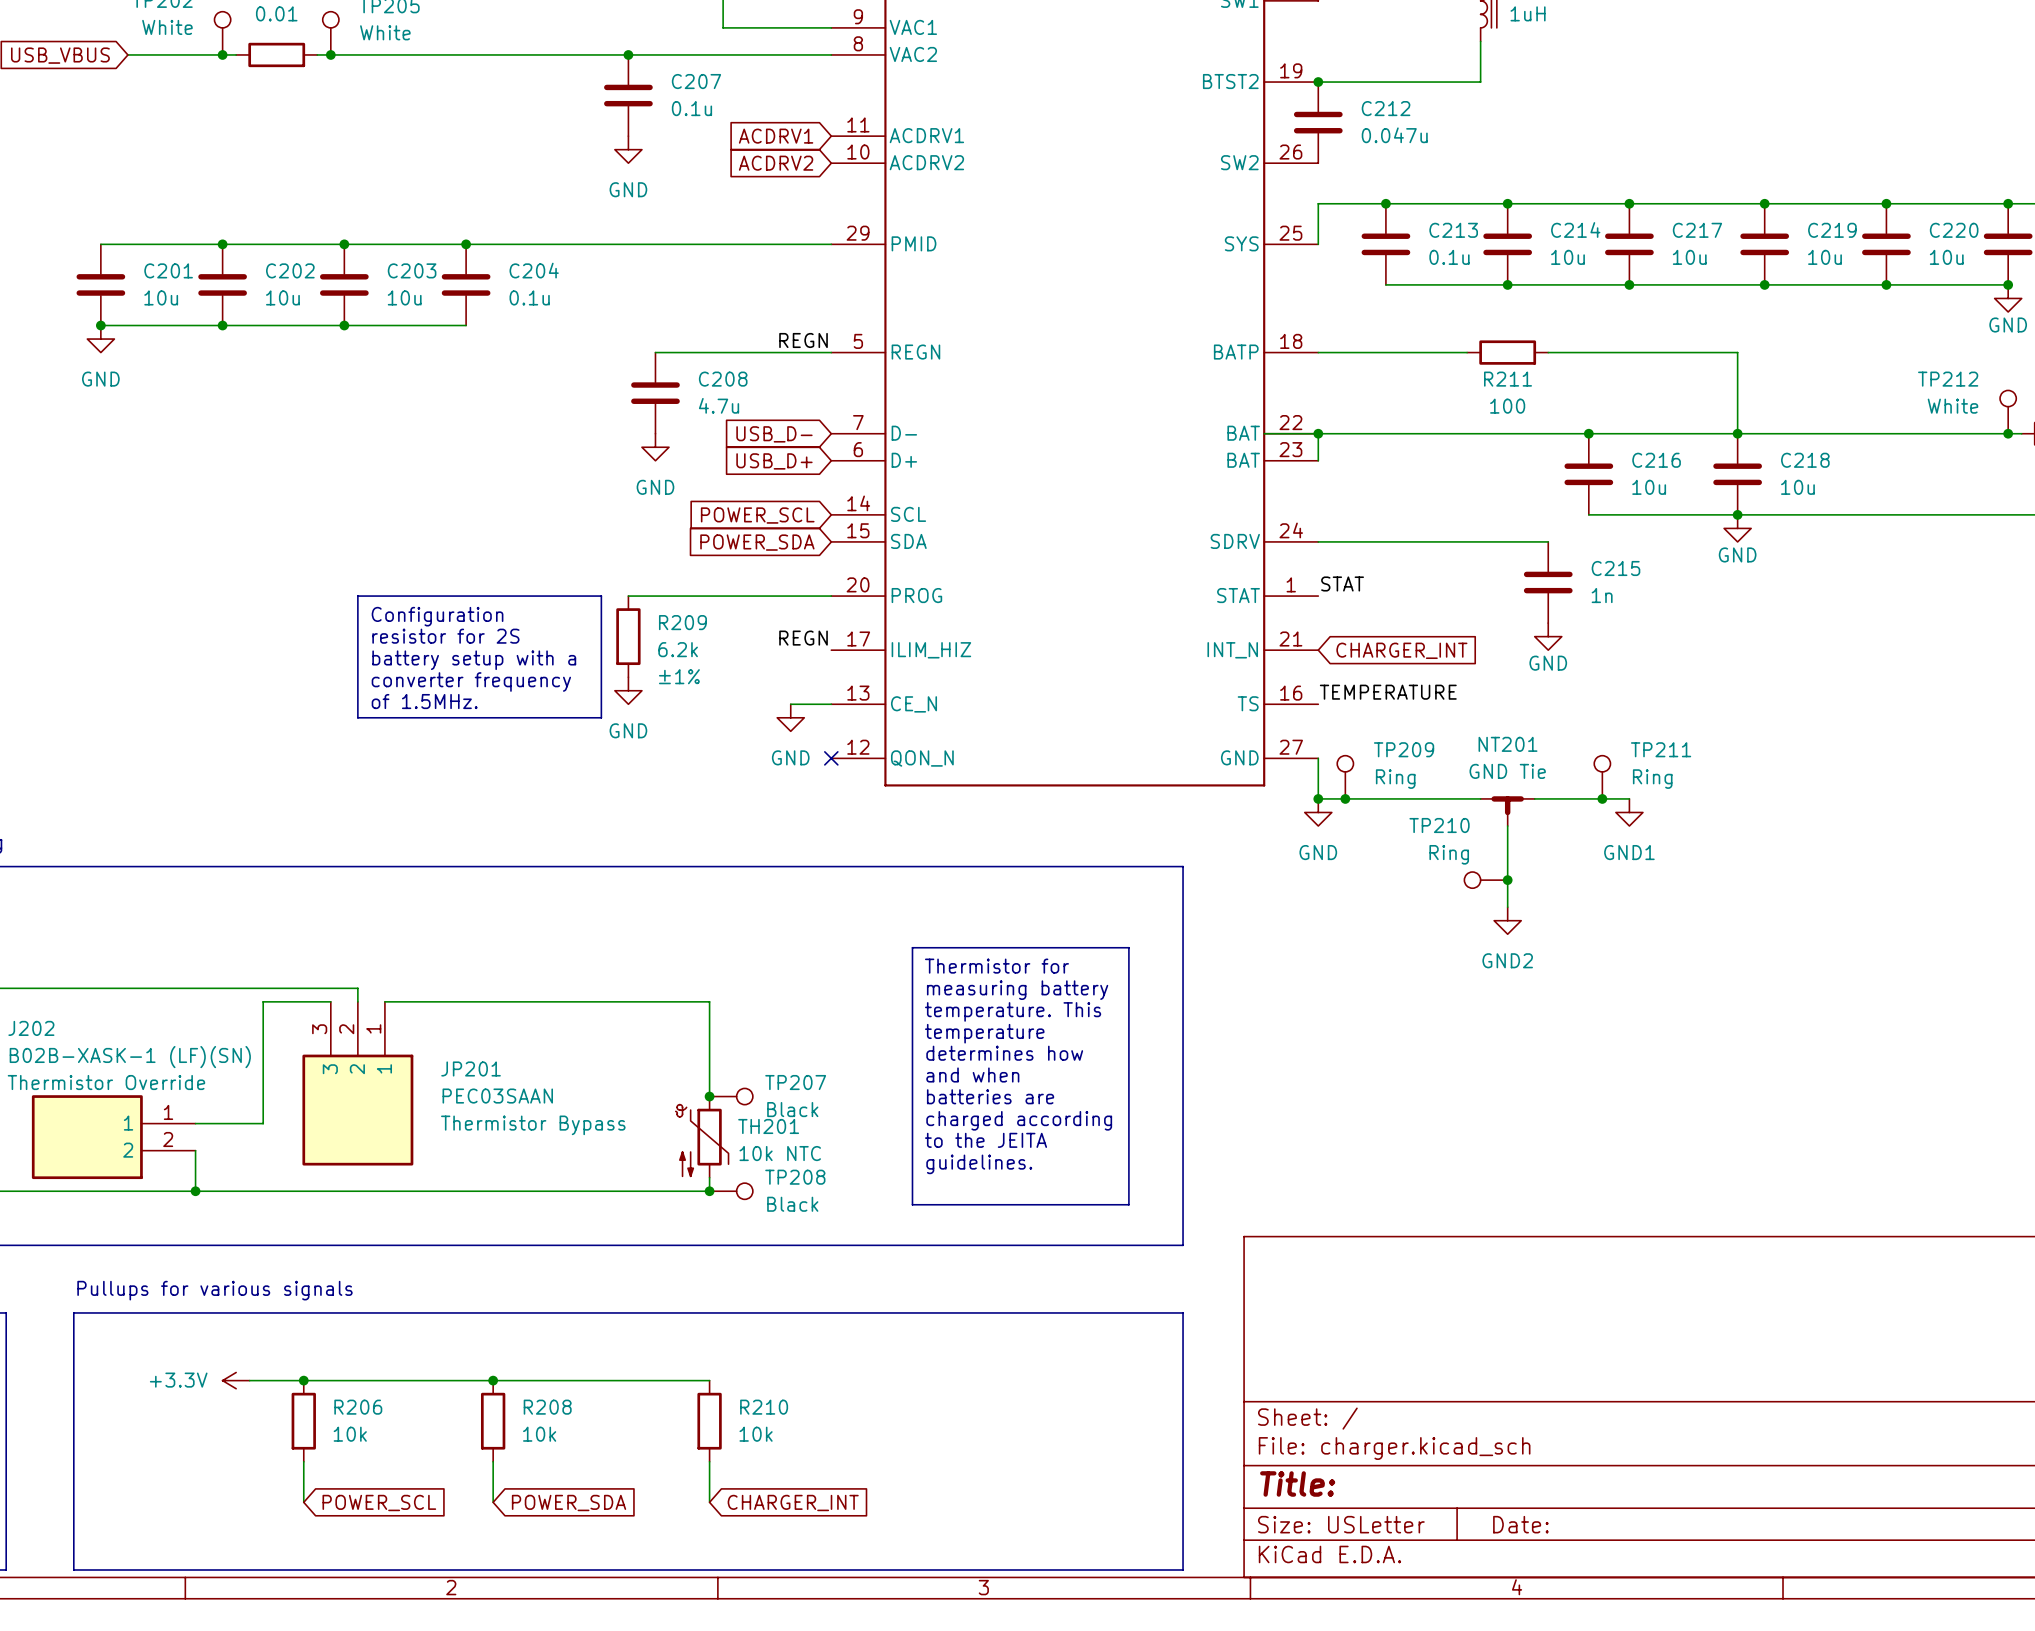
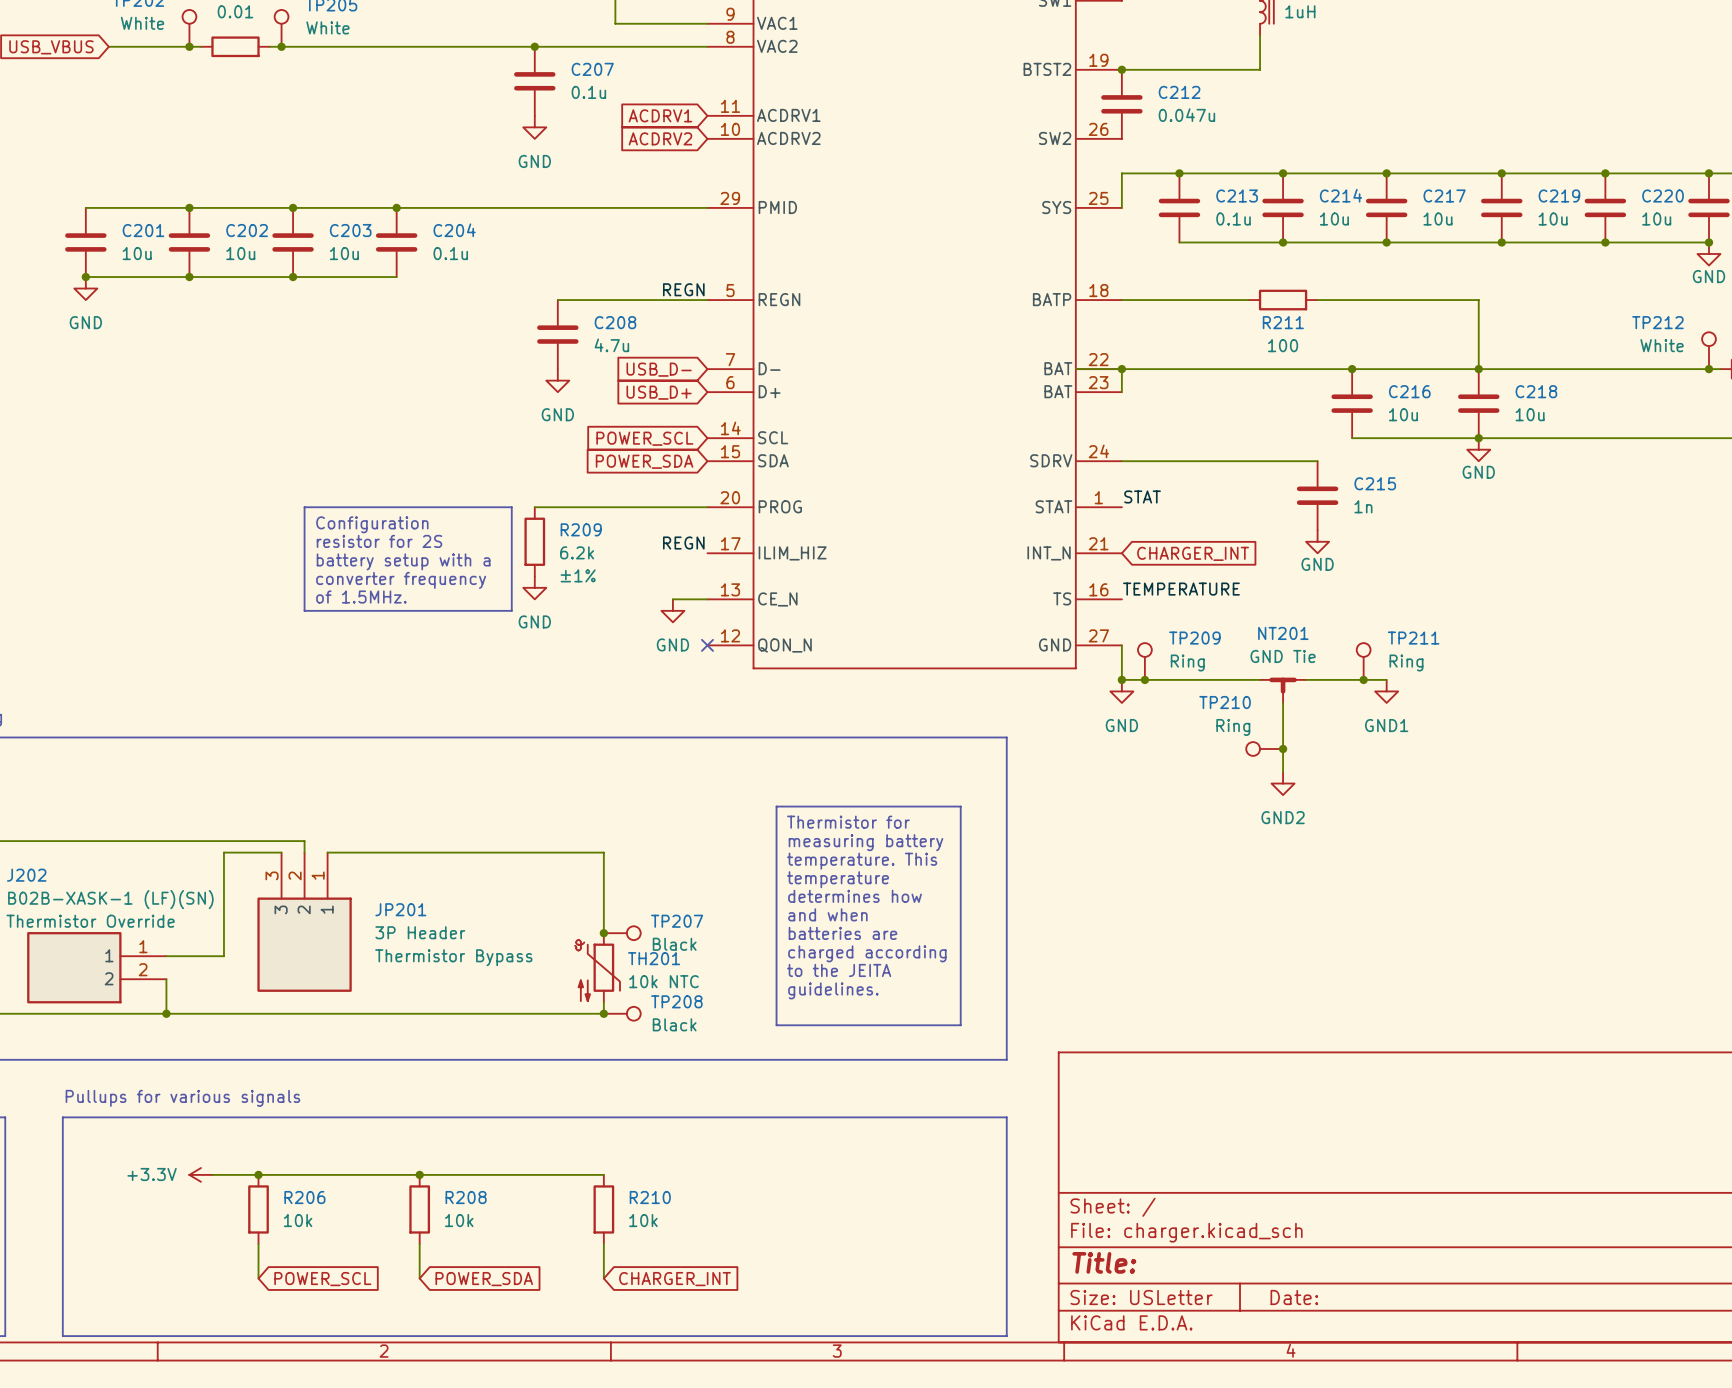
JP201 value: PEC03SAAN (497, 1096) -> 3P Header (420, 932)

